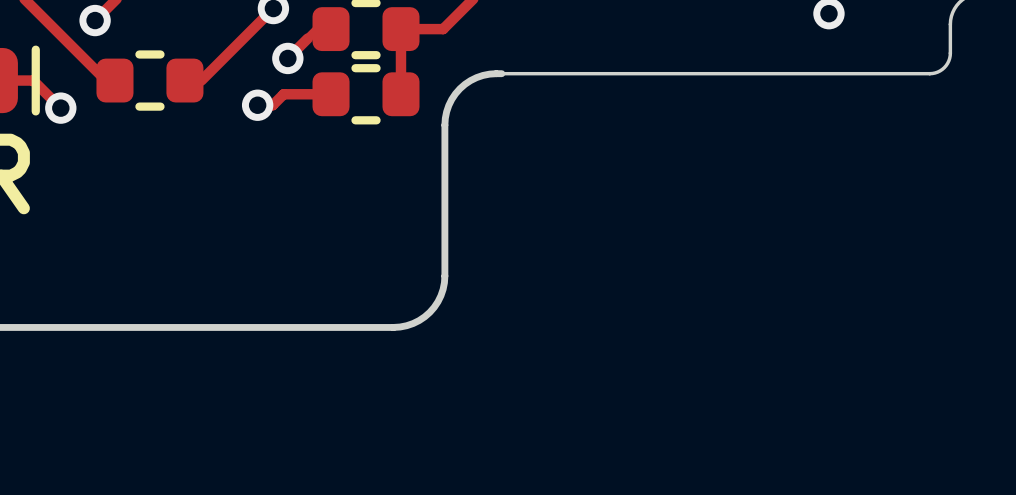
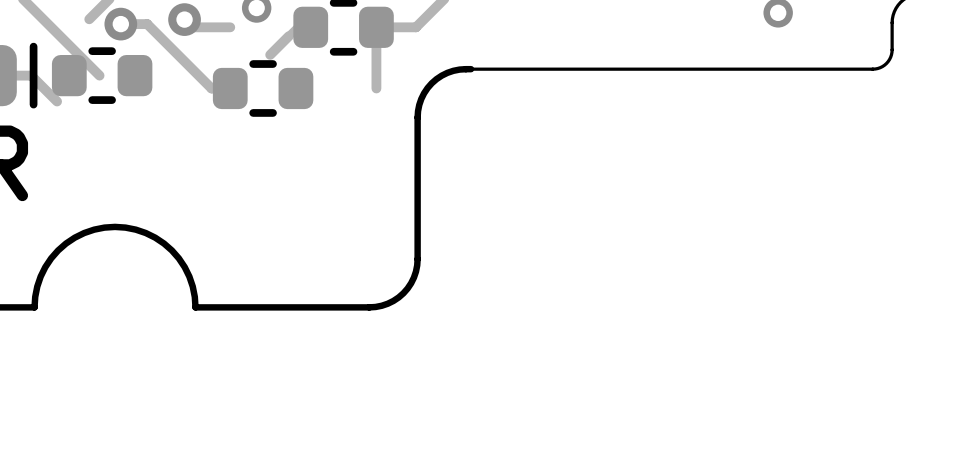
track: (273, 8) (201, 80) -> none
via: (95, 20) -> none
track: none -> (184, 19) (192, 27) (230, 27)
via: none -> (184, 19)
track: none -> (120, 24) (147, 24) (211, 88) (230, 88)
via: none -> (120, 24)
via: (287, 58) -> none
part position: (149, 80) -> (102, 75)
track: (331, 94) (283, 94) (272, 105) (257, 105) -> none
part position: (366, 94) -> (263, 88)
via: (257, 105) -> none
via: (60, 108) -> none
board edge: (36, 327) (208, 327) -> (34, 307) (40, 276) (58, 250) (84, 233) (115, 226) (145, 233) (171, 250) (189, 276) (195, 307)

